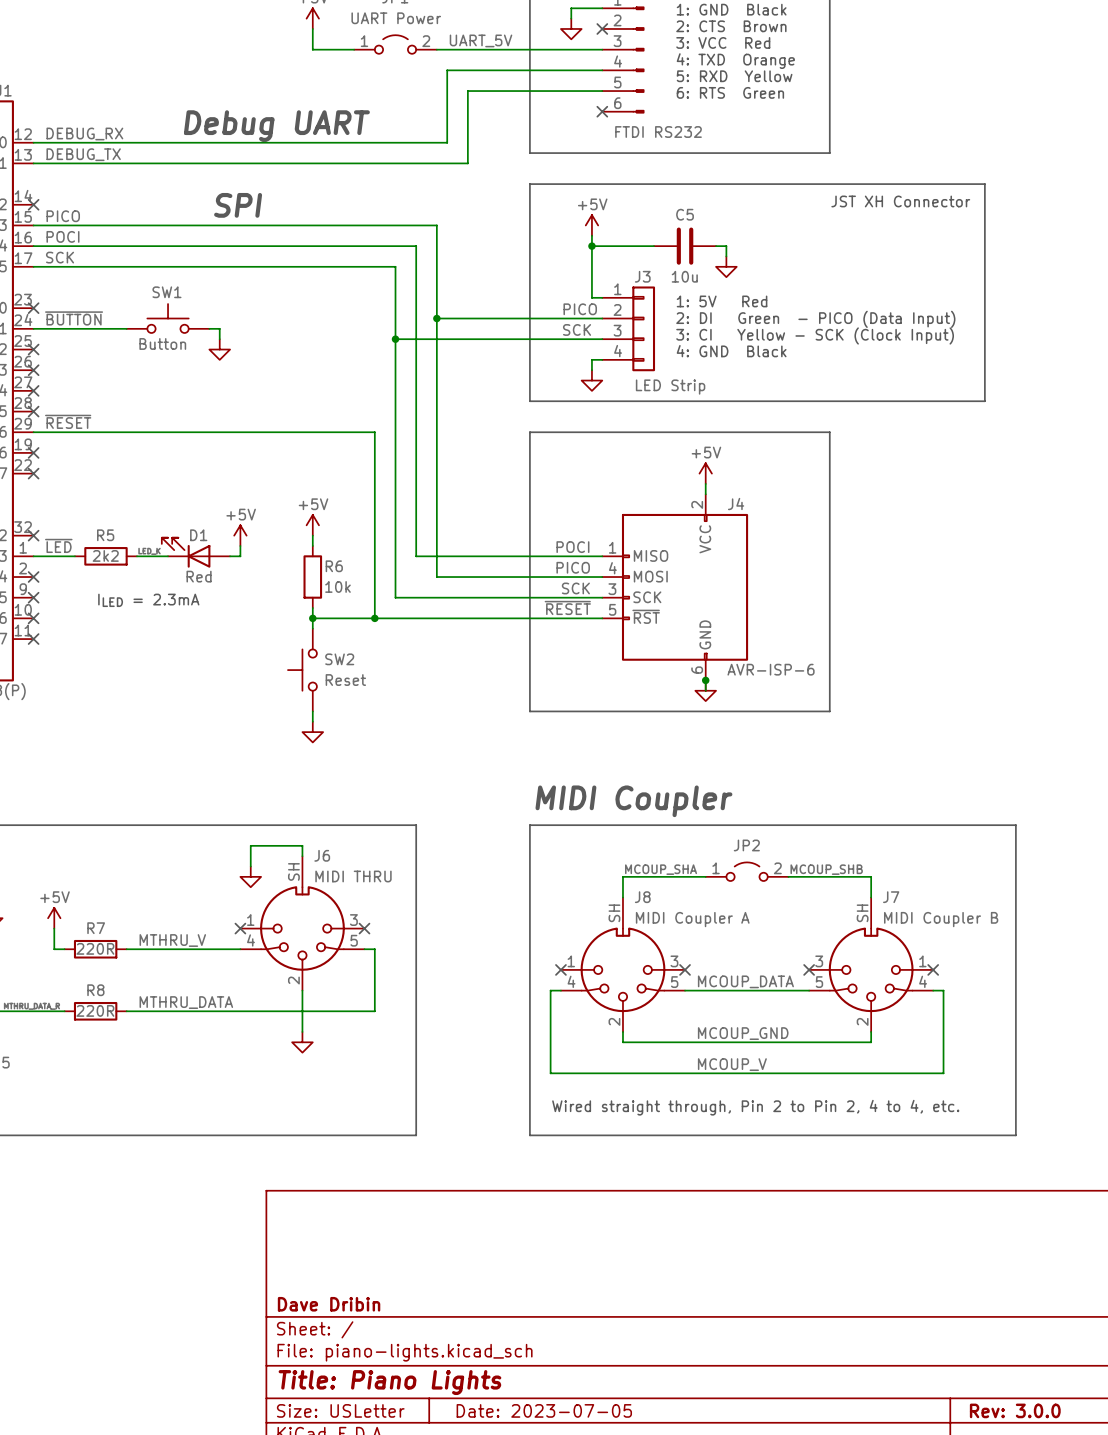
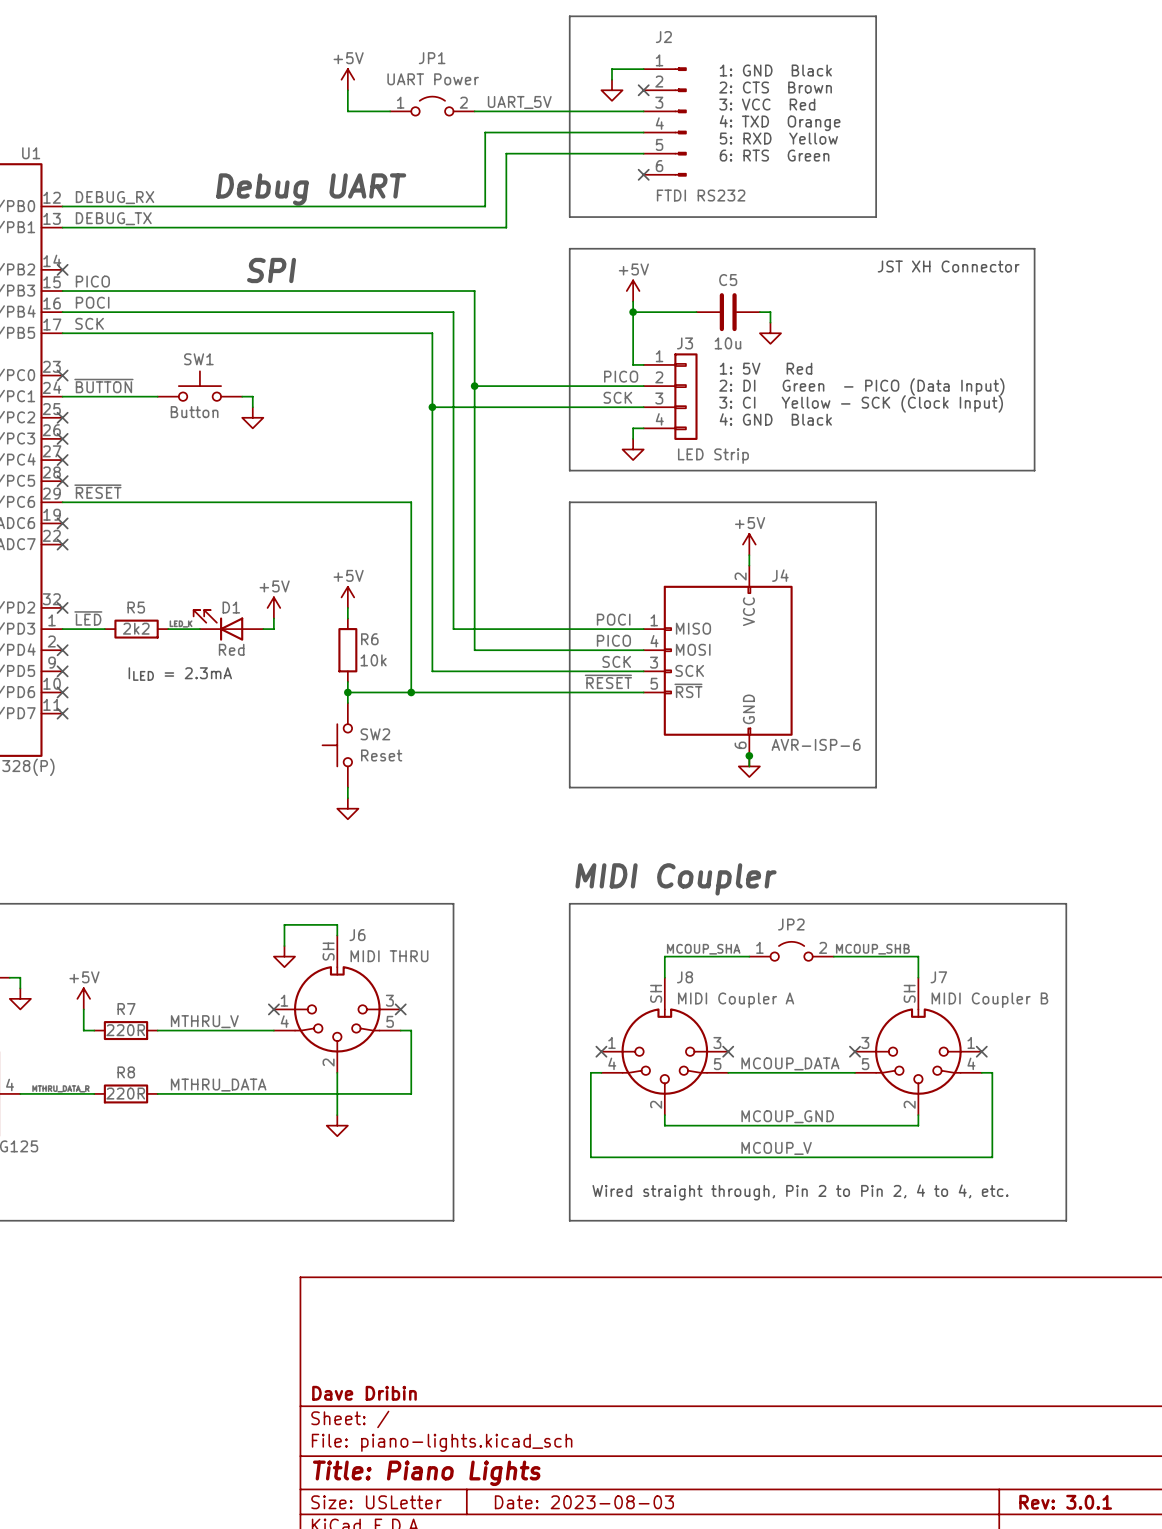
title block: Date: 2023-07-05 (544, 1410) -> Date: 2023-08-03 (584, 1502)
title block: Rev: 3.0.0 (1015, 1410) -> Rev: 3.0.1 (1065, 1502)

